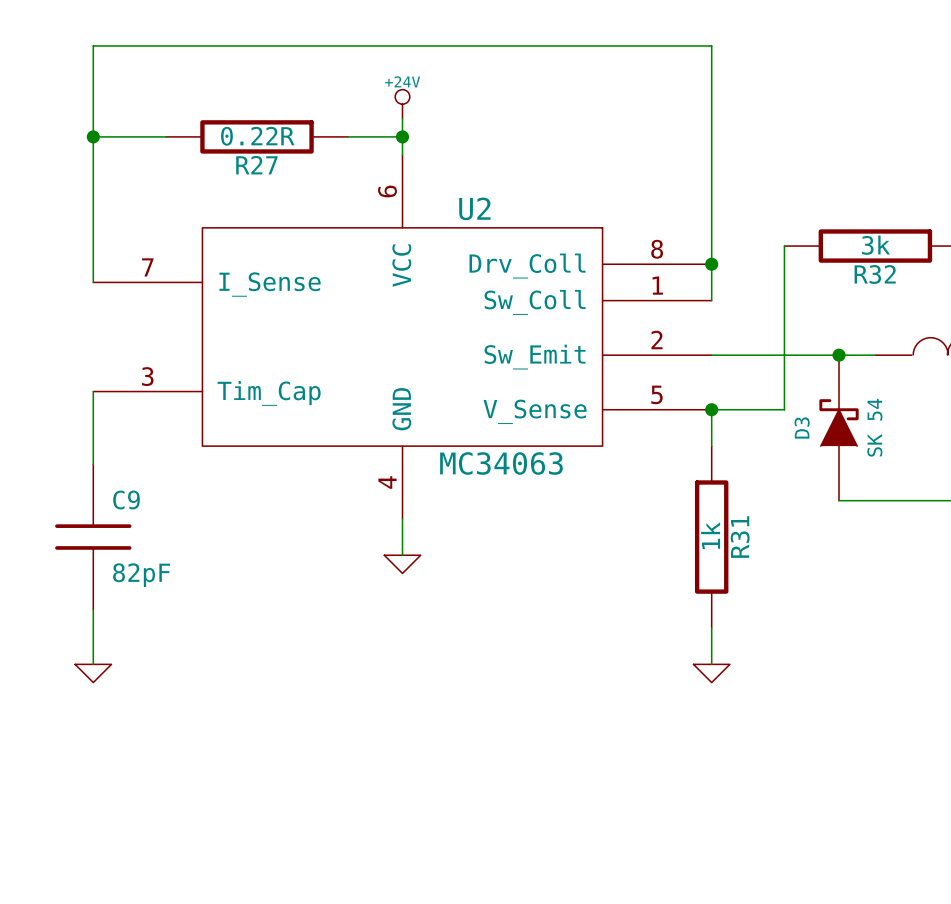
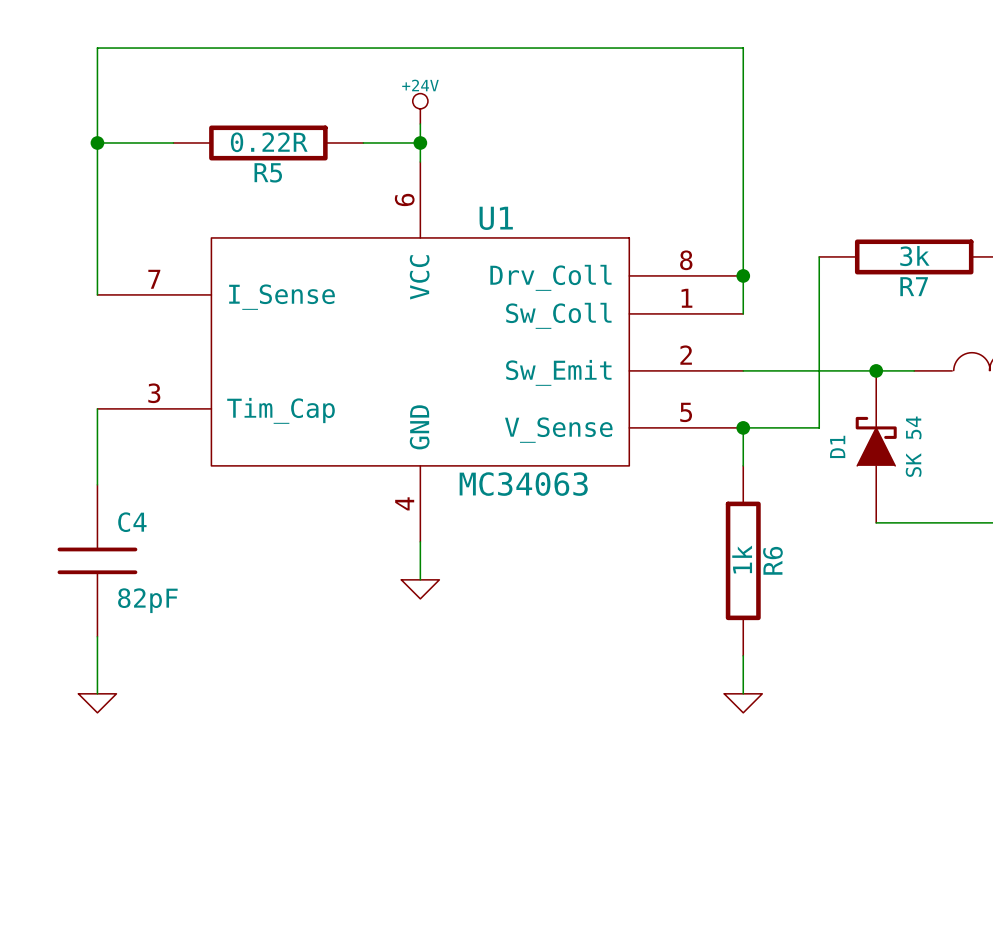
R27 name: R27 (256, 165) -> R5 (268, 172)
U2 name: U2 (474, 208) -> U1 (496, 218)
R32 name: R32 (875, 274) -> R7 (914, 286)
D3 name: D3 (802, 428) -> D1 (837, 446)
C9 name: C9 (126, 500) -> C4 (132, 522)
R31 name: R31 (740, 537) -> R6 (772, 560)

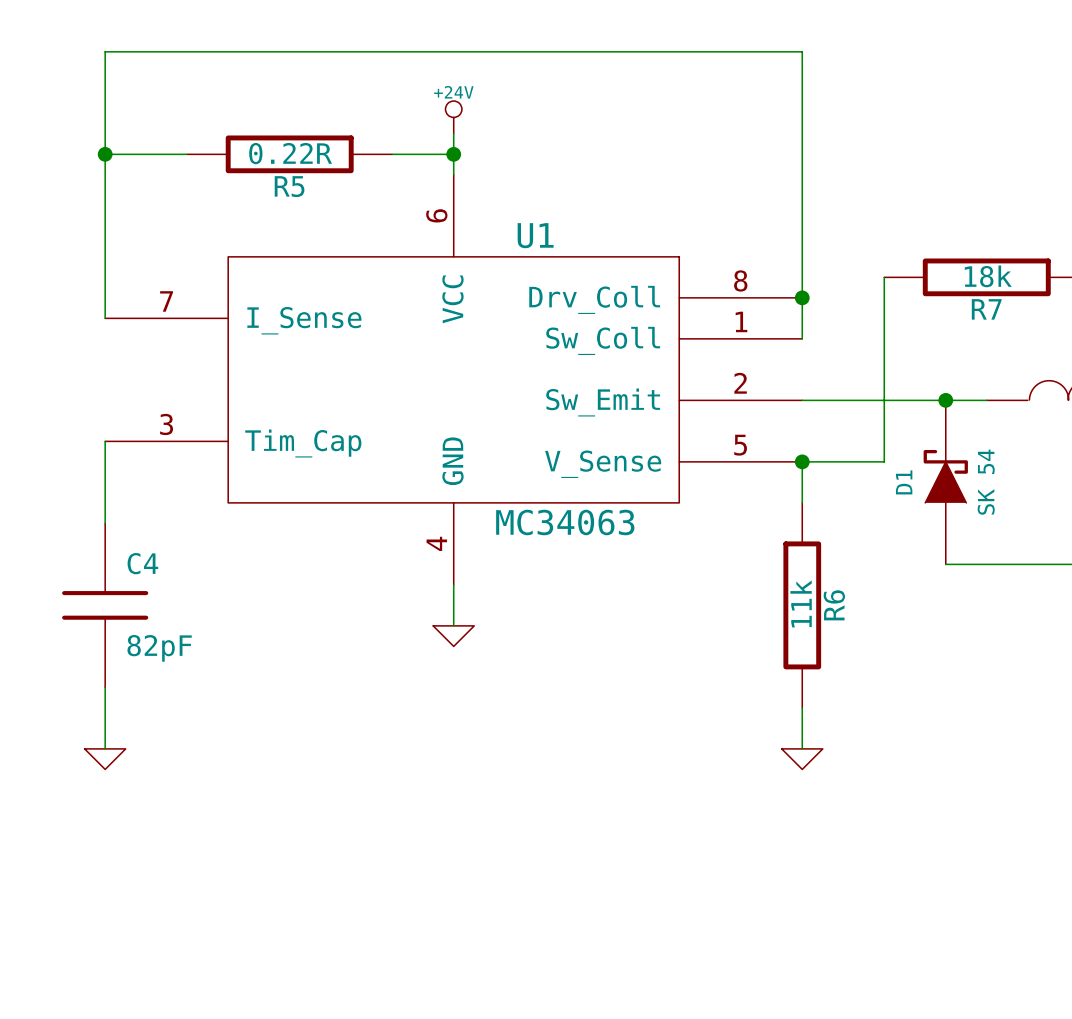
R7 value: 3k (914, 256) -> 18k (988, 276)
R6 value: 1k (742, 559) -> 11k (801, 603)

